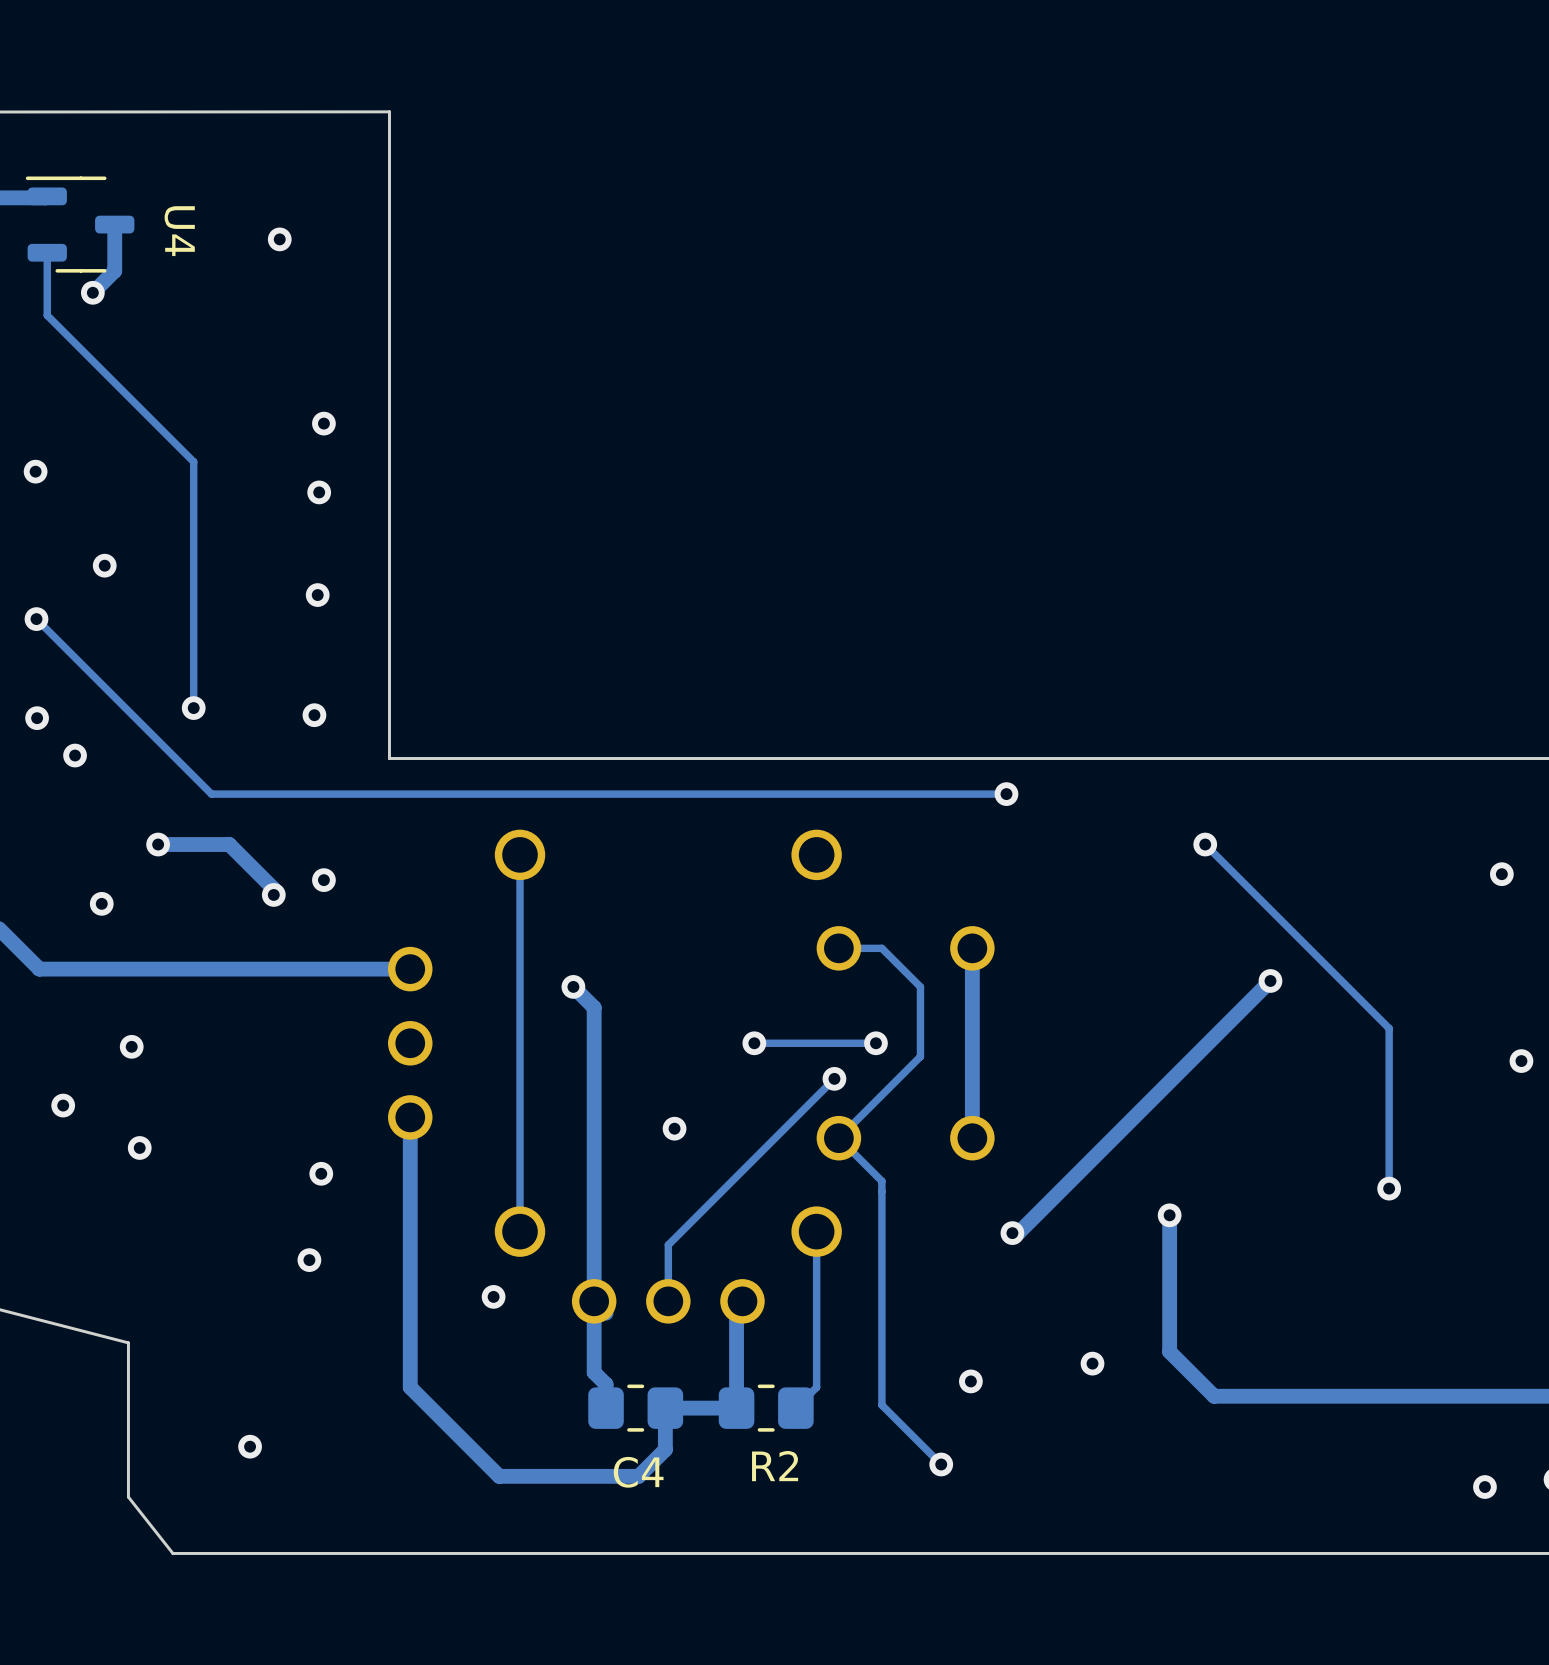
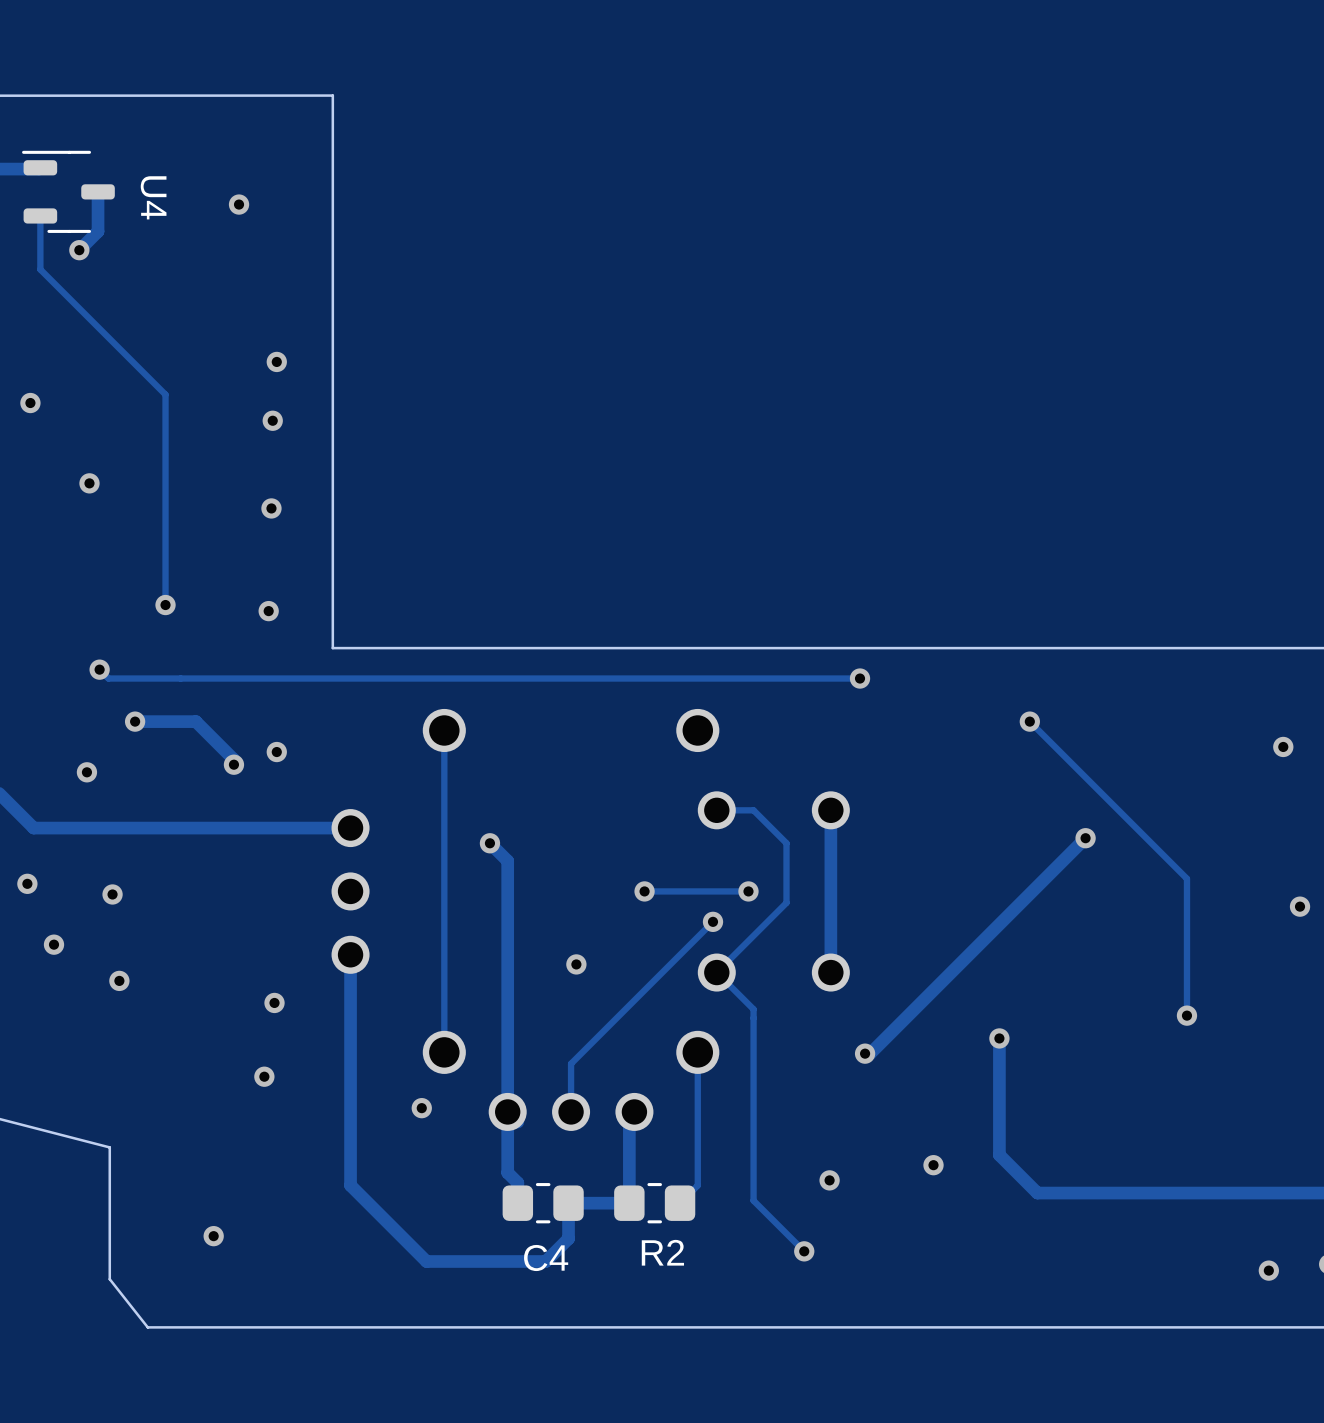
track: (36, 619) (211, 794) -> (99, 669) (108, 678) (180, 678)
via: (36, 619) -> none
via: (37, 718) -> none
via position: (75, 755) -> (99, 669)
via: none -> (27, 883)

